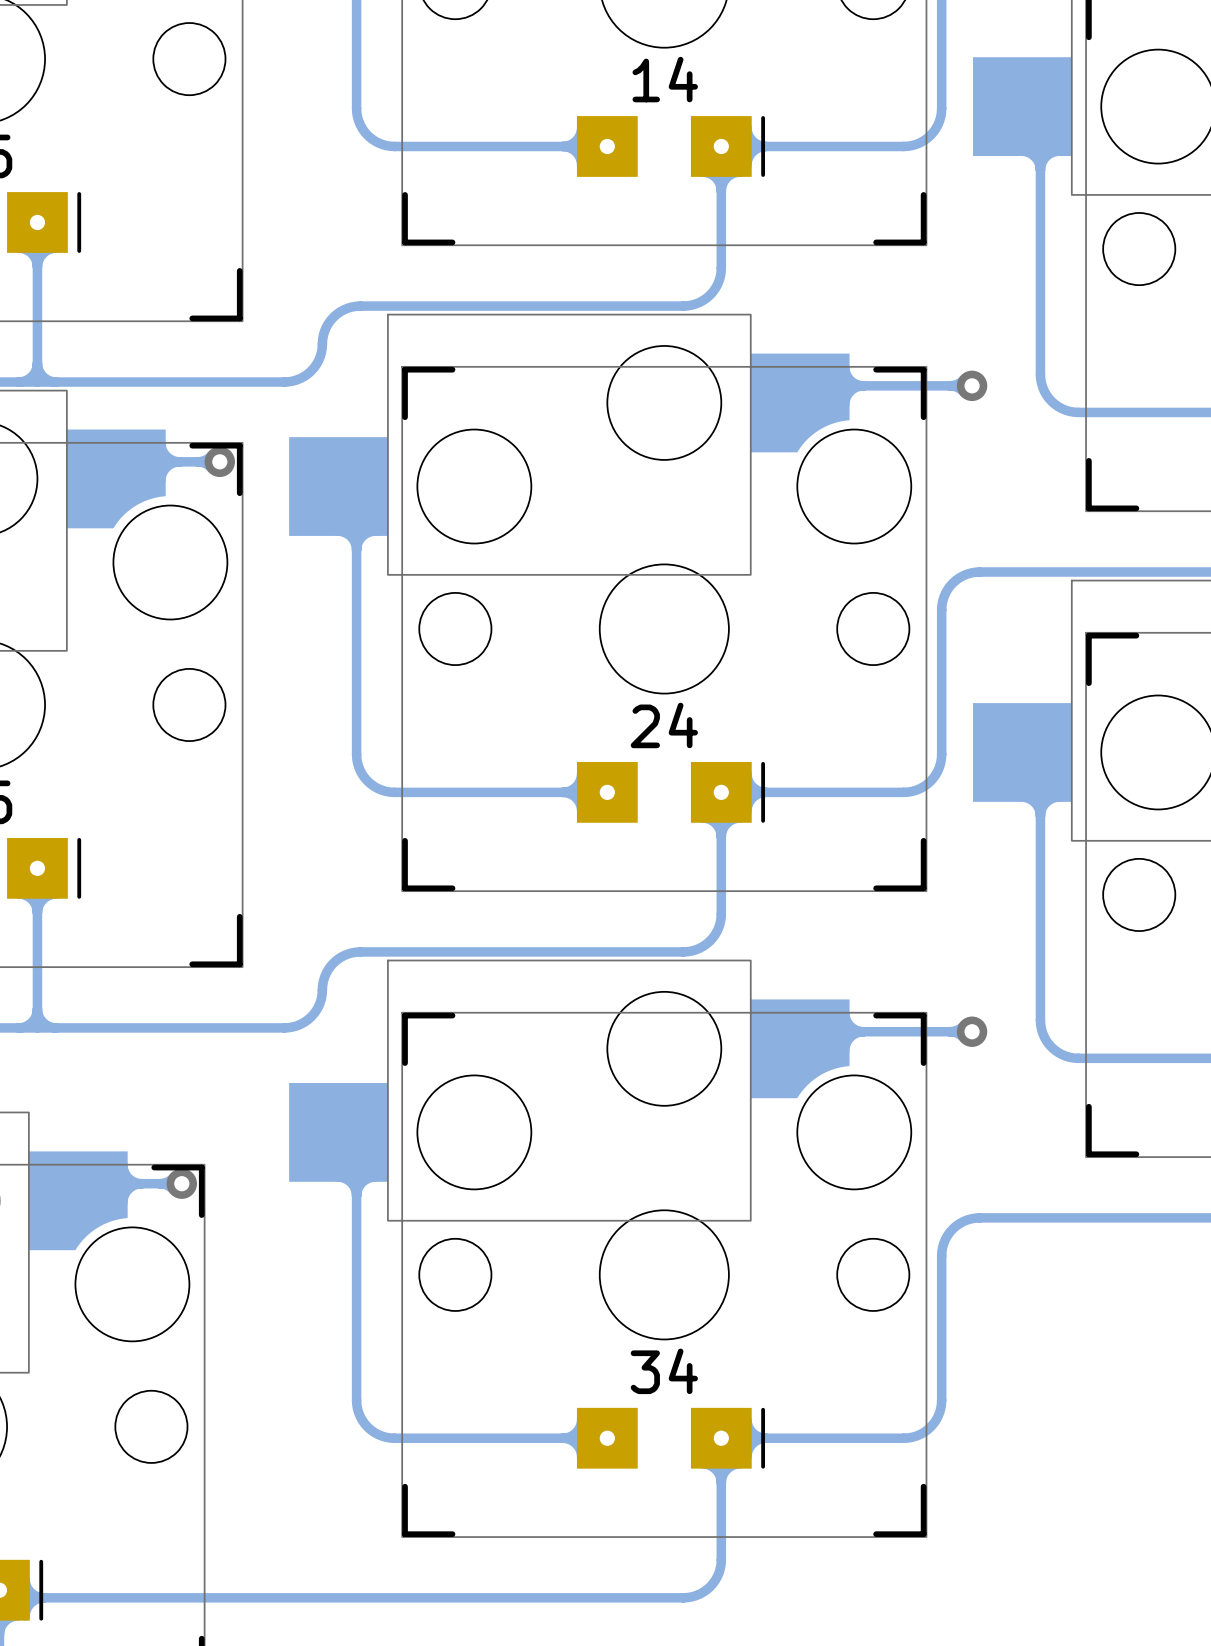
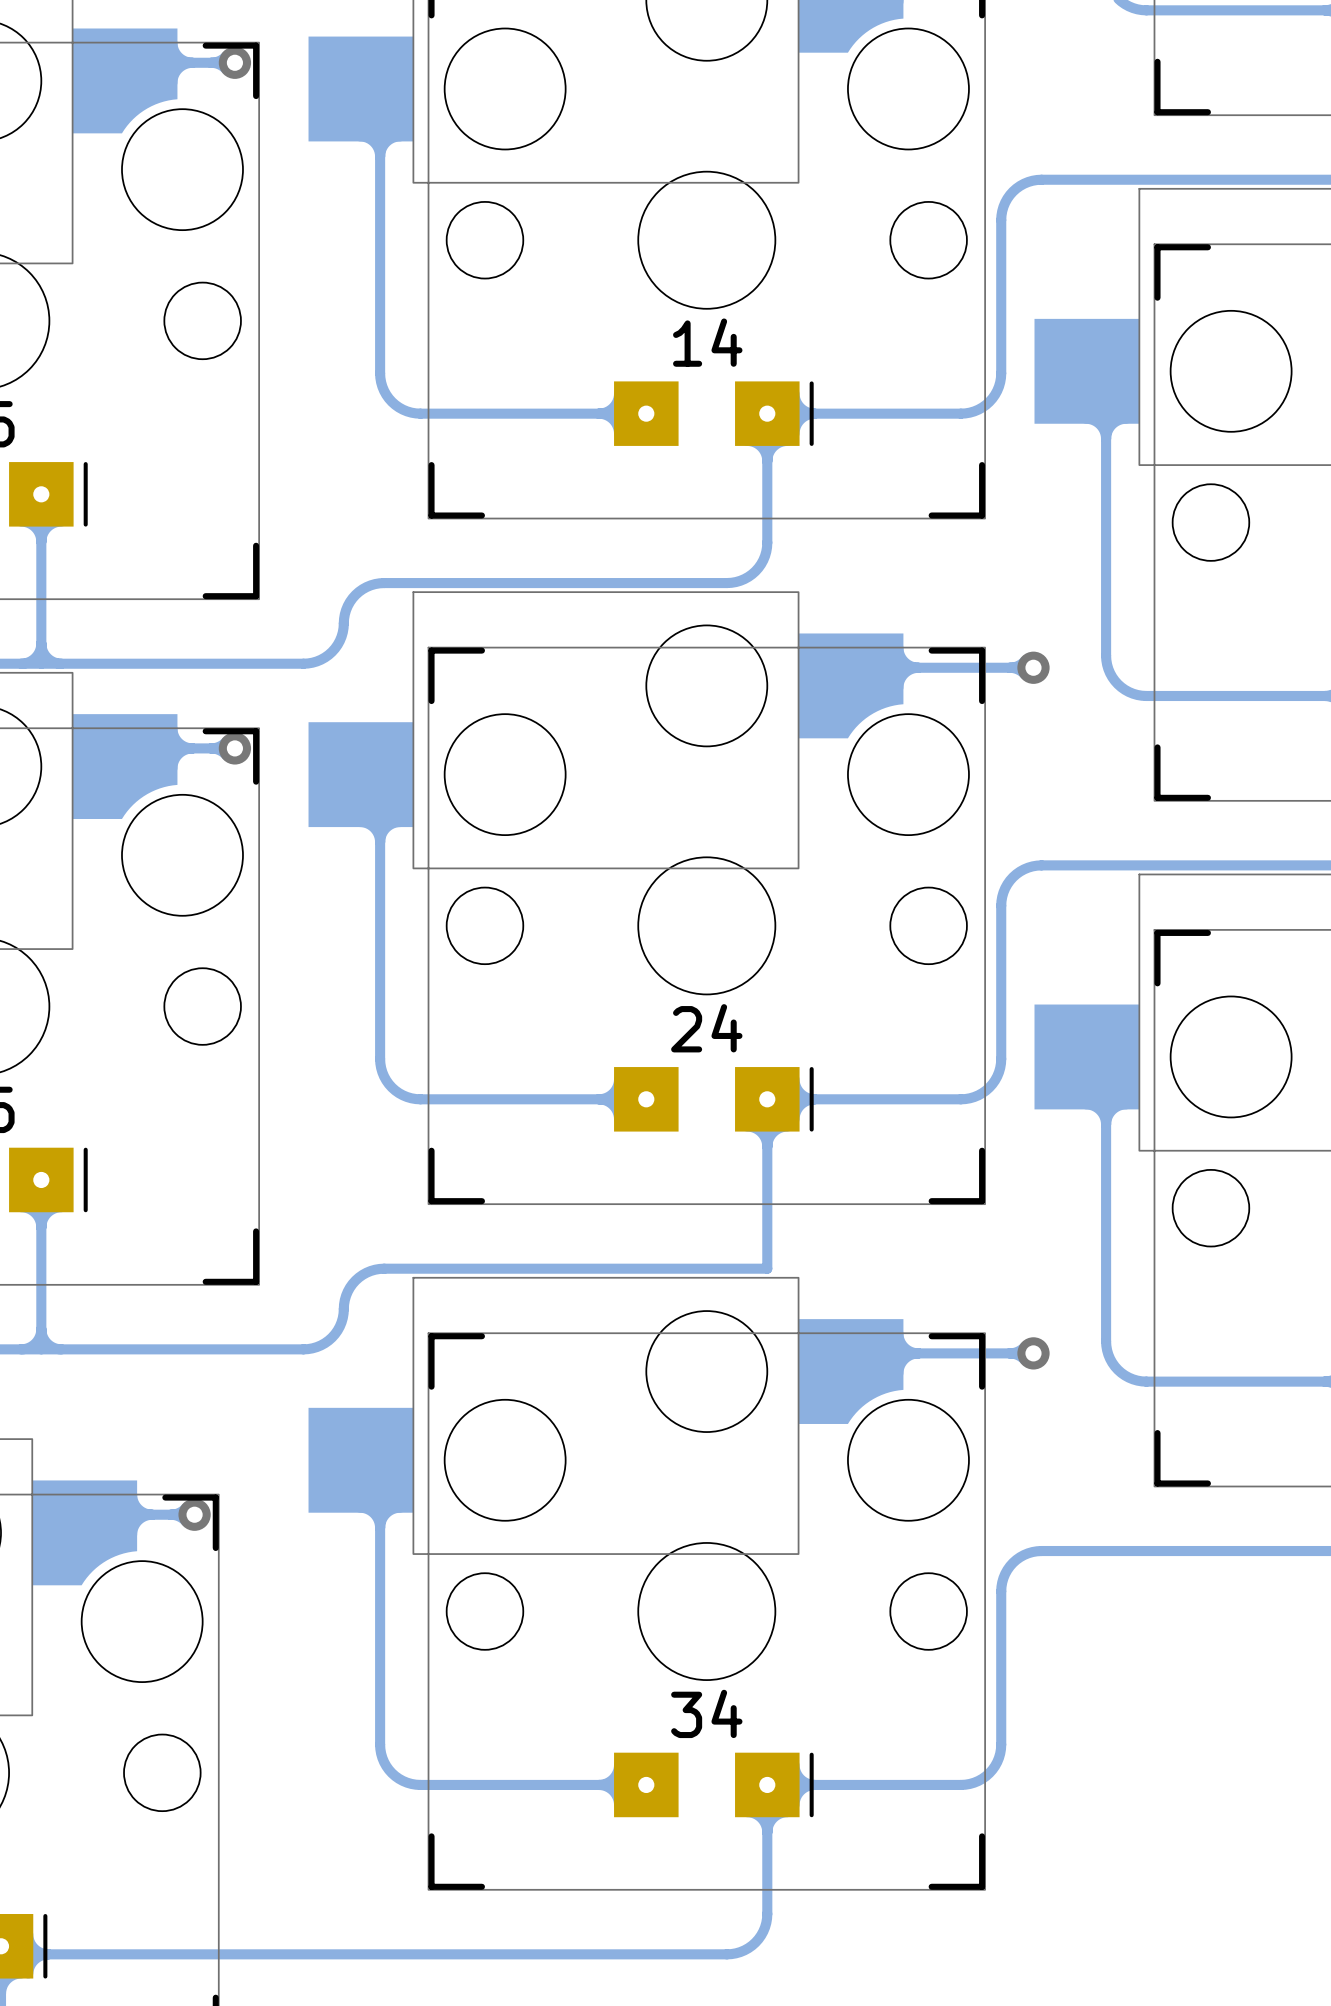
track: (721, 913) (719, 926) (710, 940) (695, 949) (683, 951) -> (767, 1228) (767, 1268) (726, 1268)

